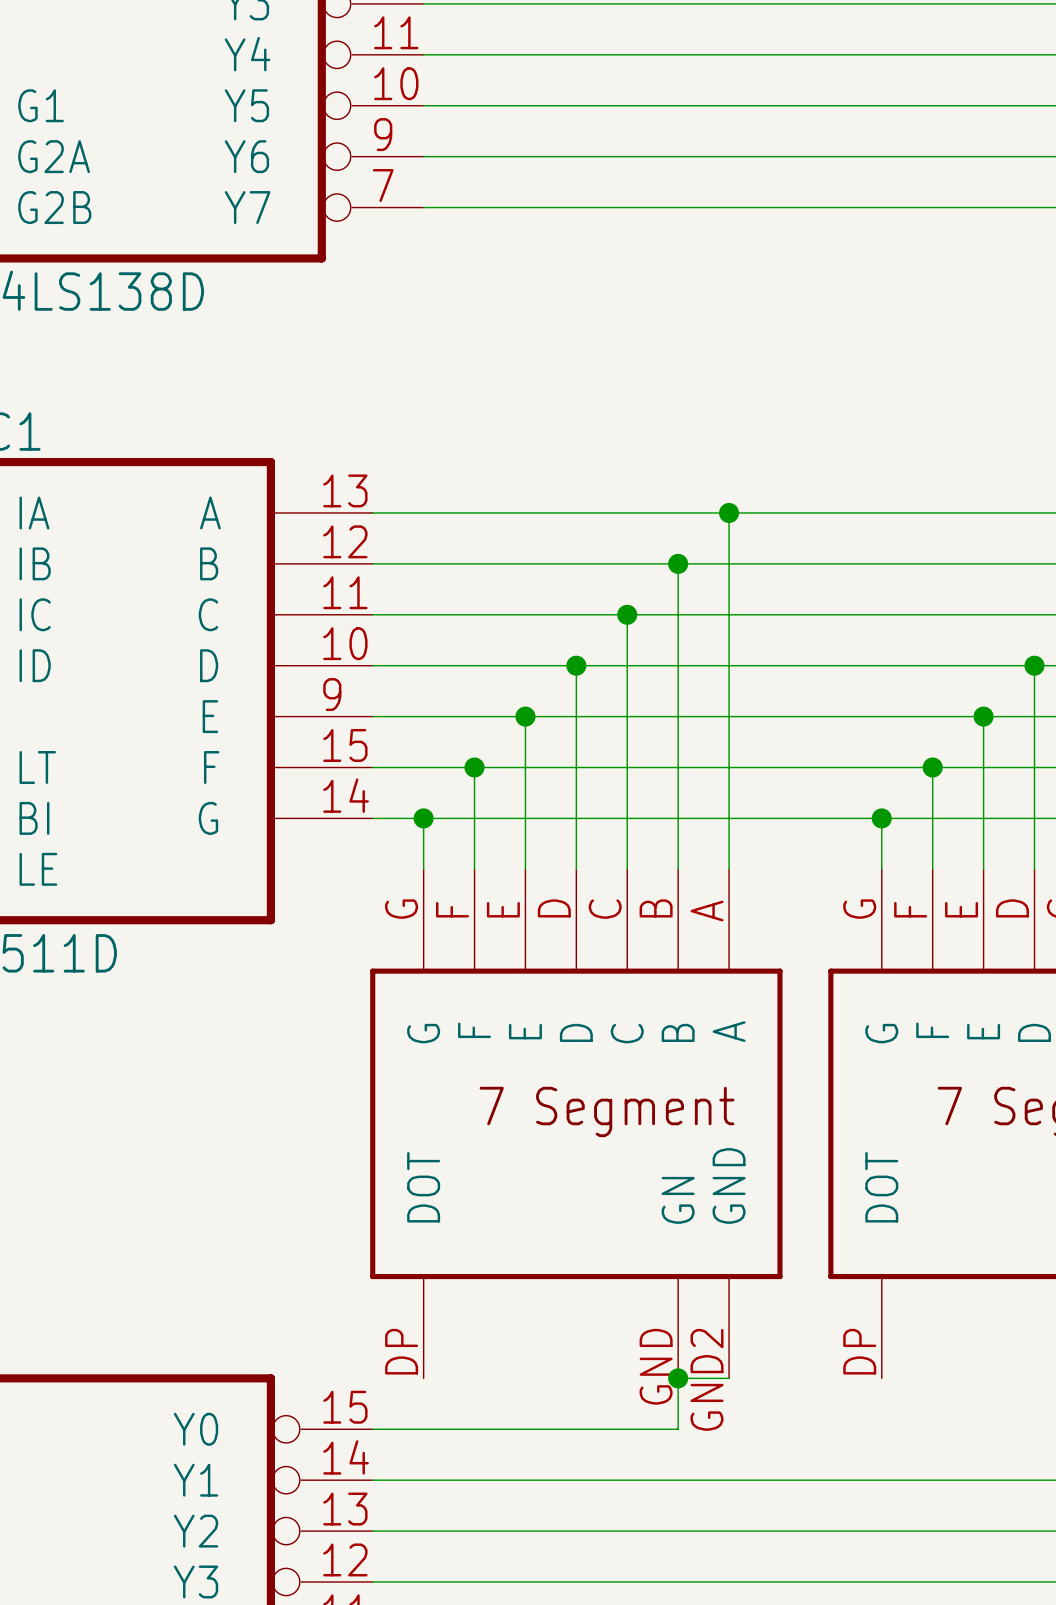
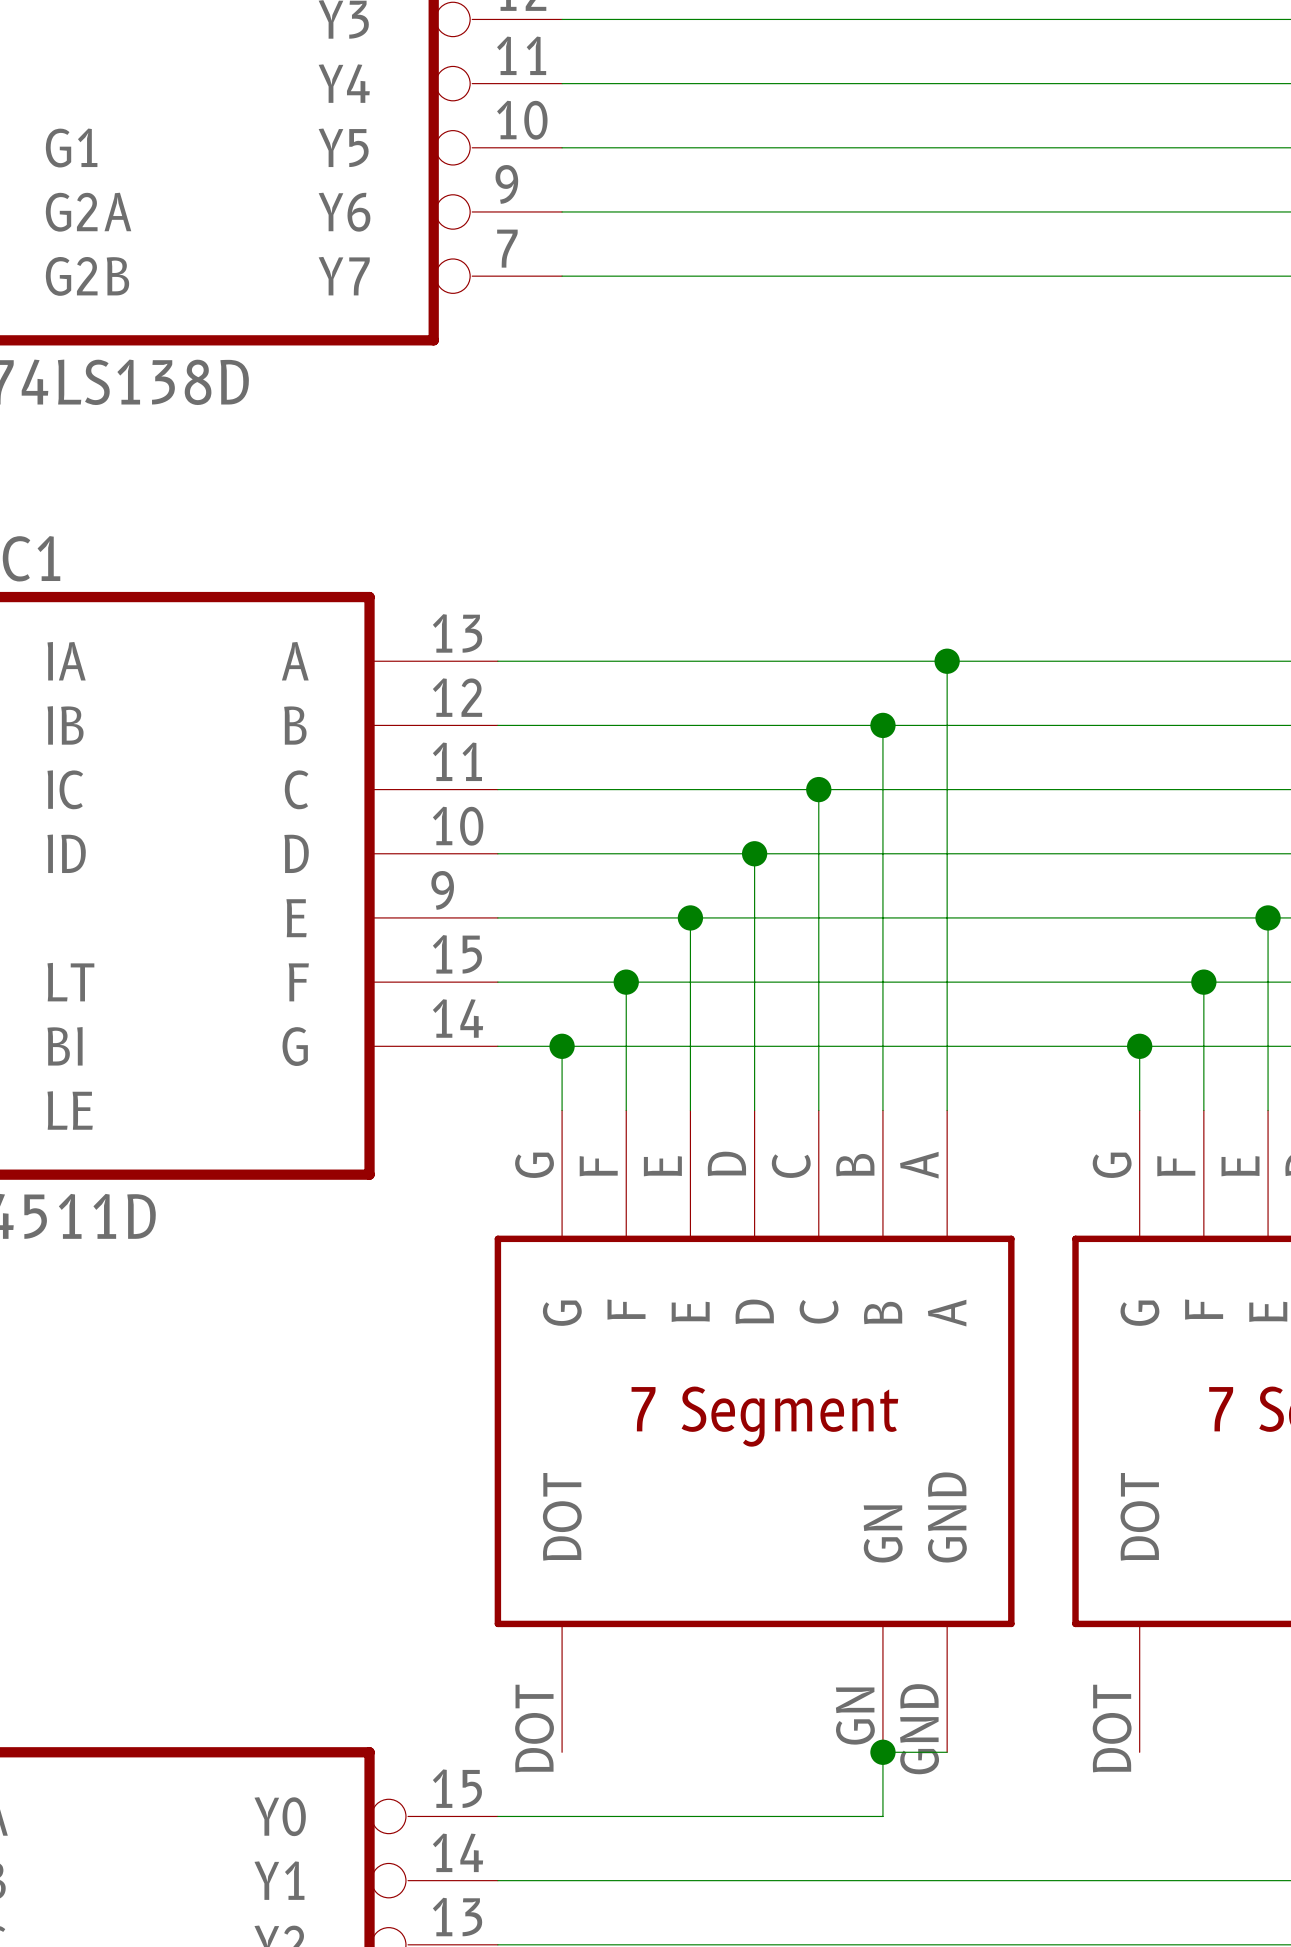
part pin number: DP (401, 1351) -> DOT (534, 1728)
part pin number: DP (859, 1351) -> DOT (1112, 1728)
part pin number: GND (656, 1366) -> GN (855, 1716)
part pin number: GND2 (707, 1379) -> GND (919, 1729)

